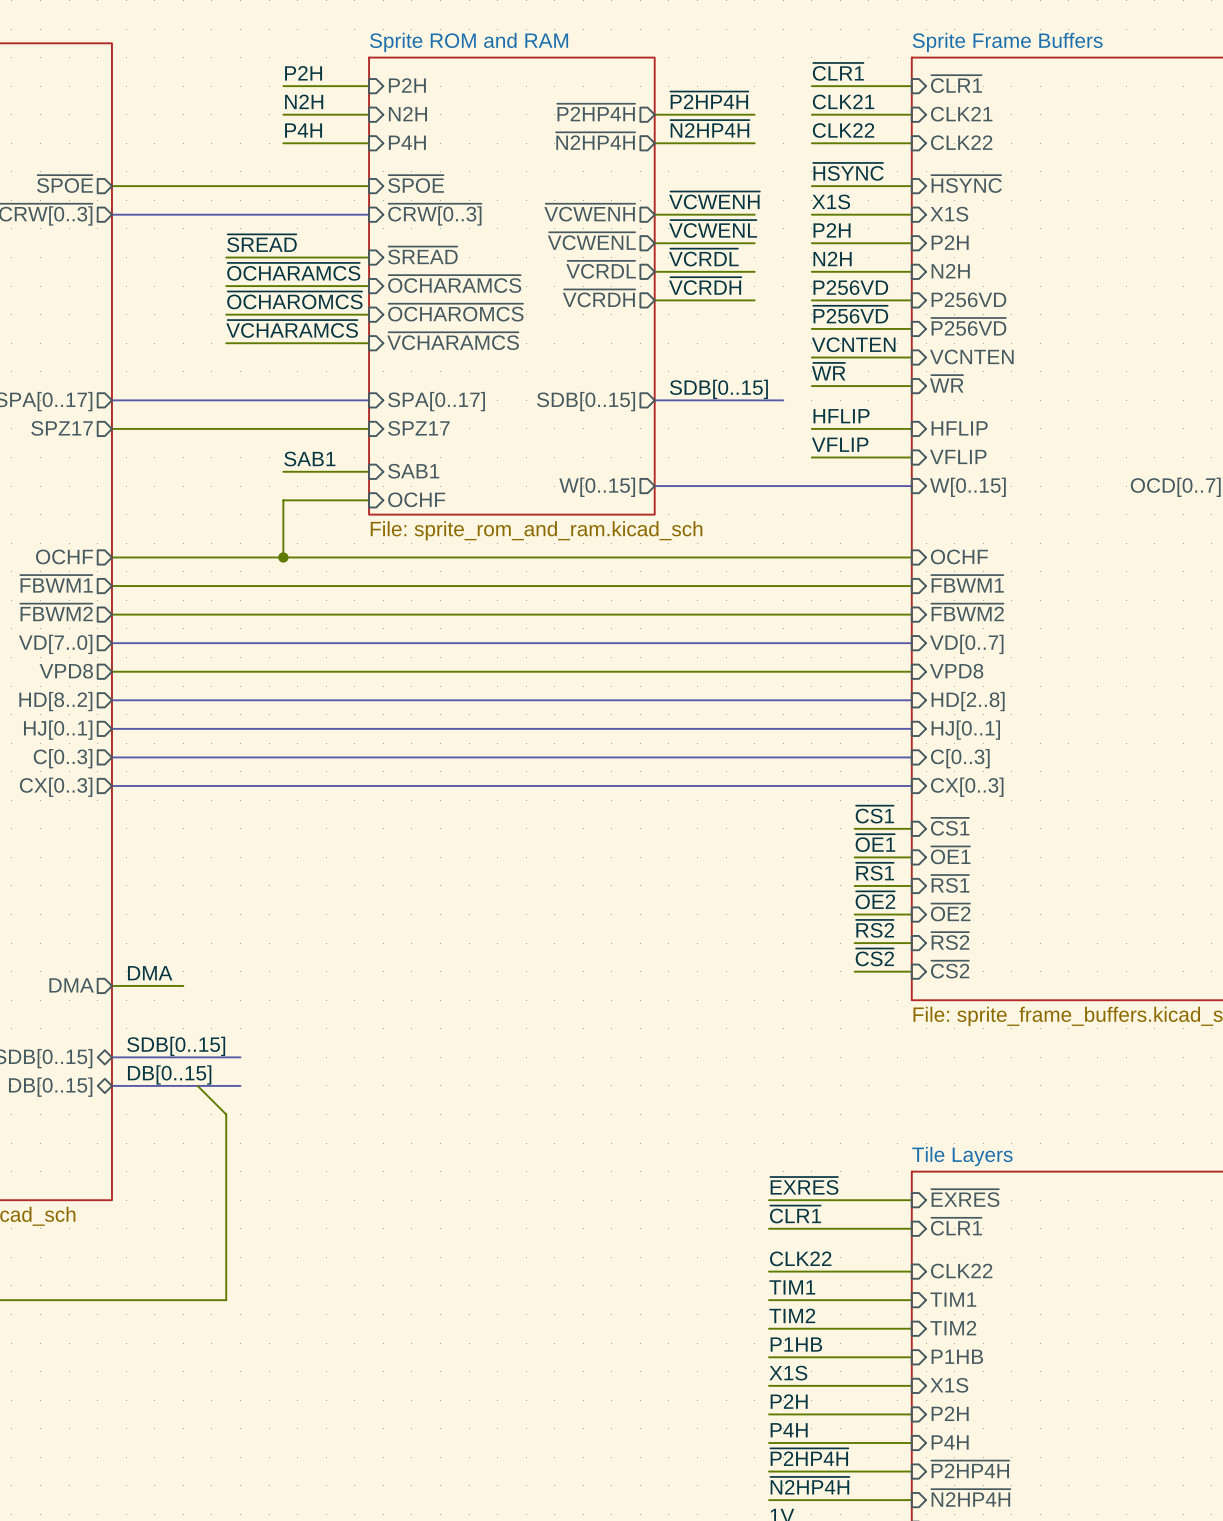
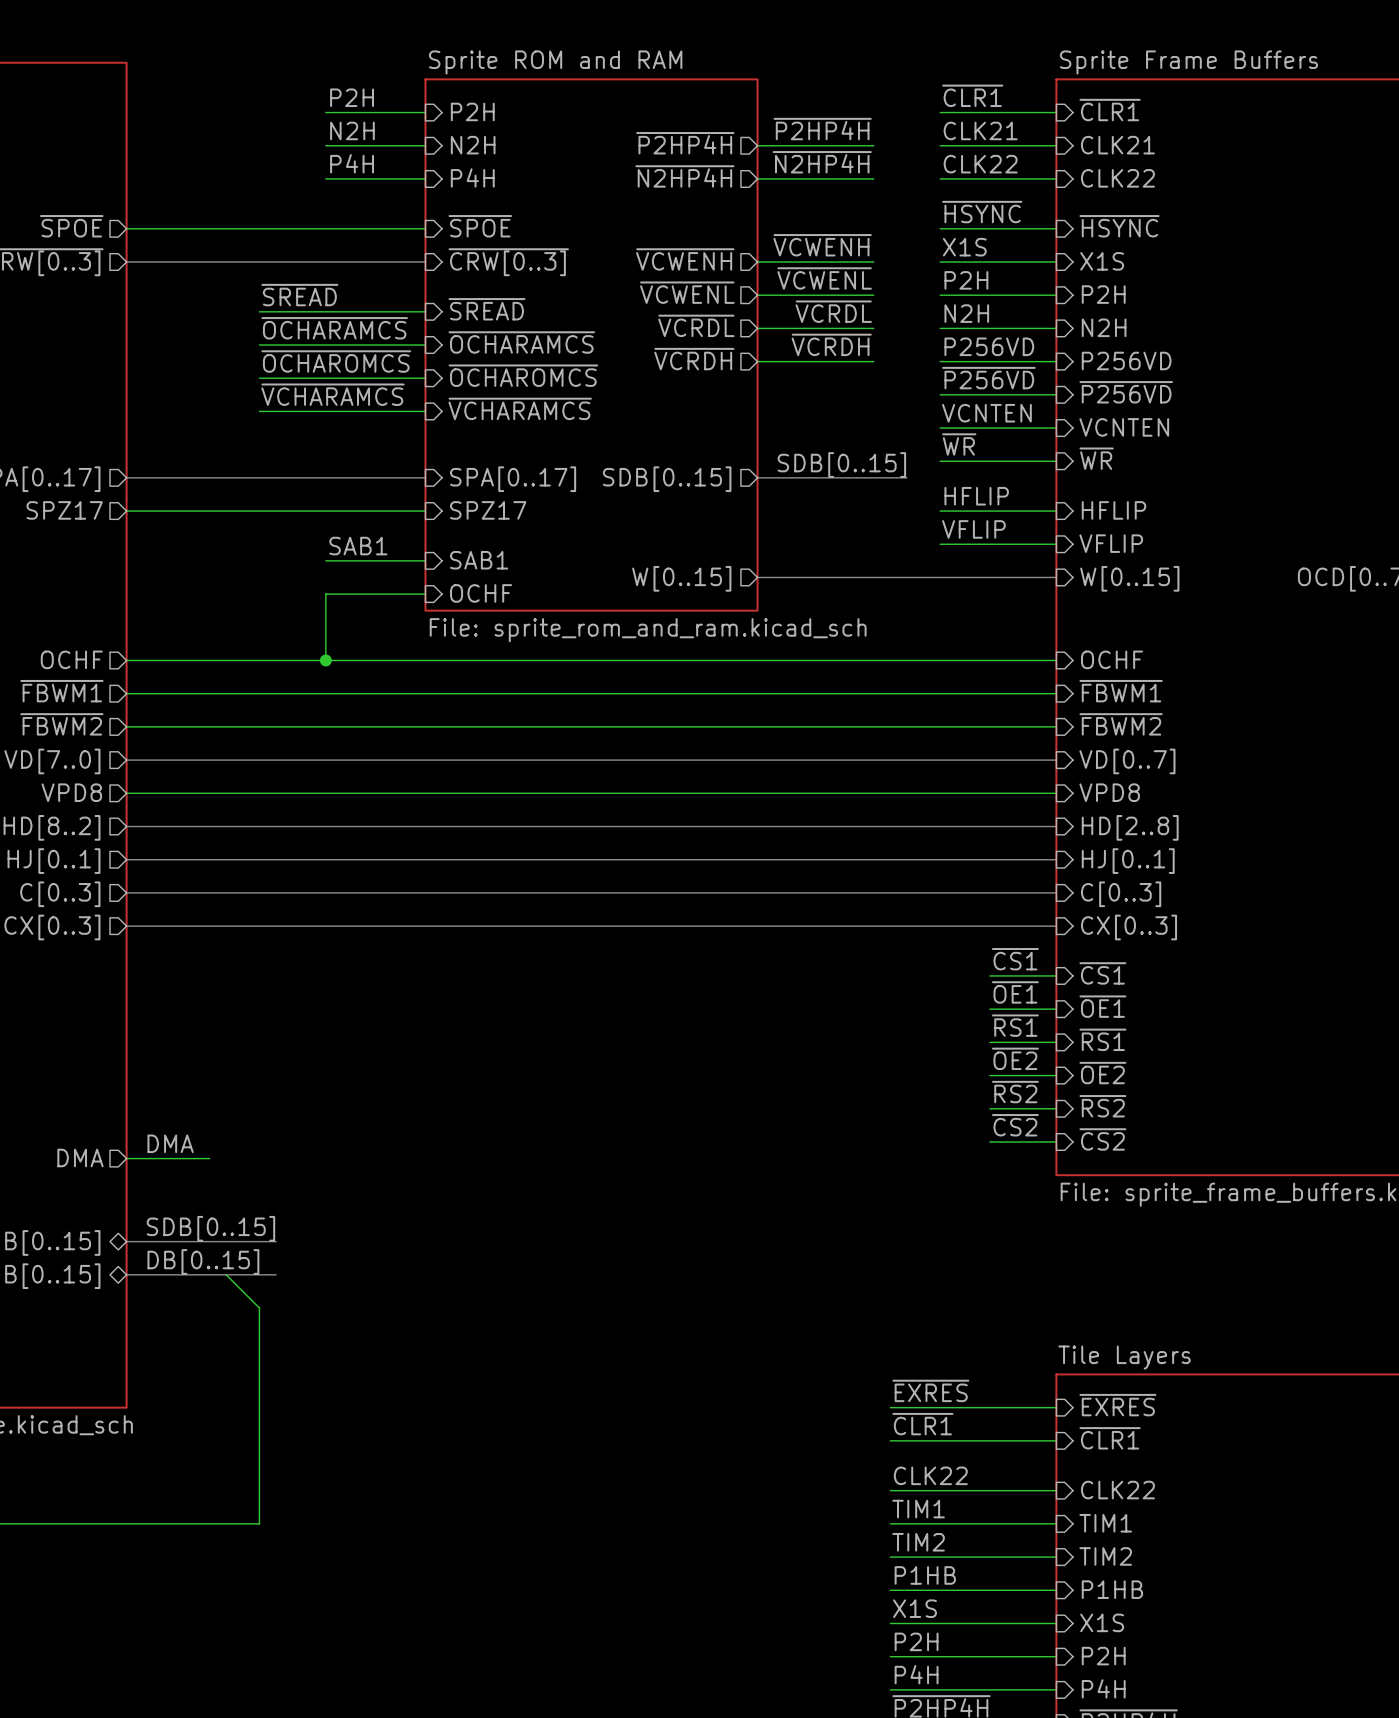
label position: ~{P2HP4H} (709, 100) -> ~{P2HP4H} (822, 129)
label position: ~{N2HP4H} (709, 128) -> ~{N2HP4H} (822, 162)
label position: ~{VCWENH} (714, 200) -> ~{VCWENH} (822, 245)
label position: ~{VCWENL} (713, 228) -> ~{VCWENL} (824, 278)
label position: ~{VCRDL} (703, 257) -> ~{VCRDL} (833, 311)
label position: ~{VCRDH} (705, 286) -> ~{VCRDH} (831, 344)

